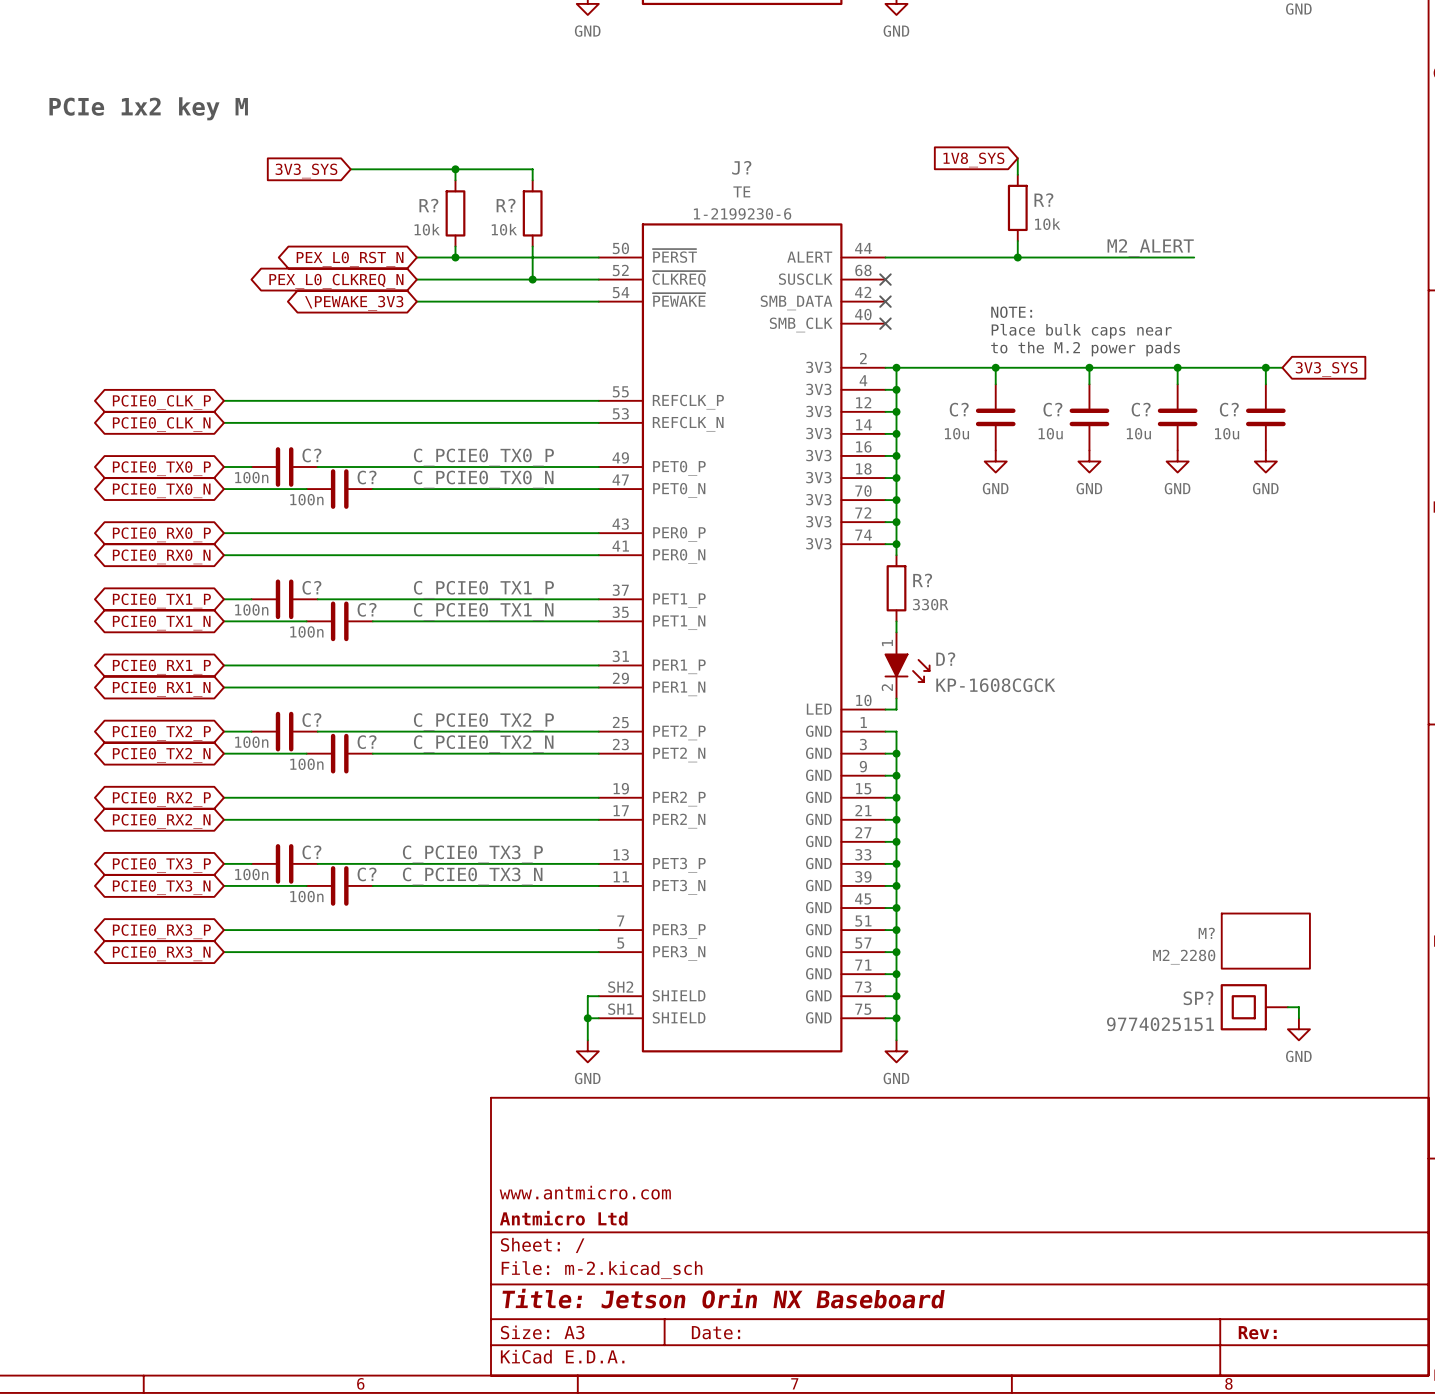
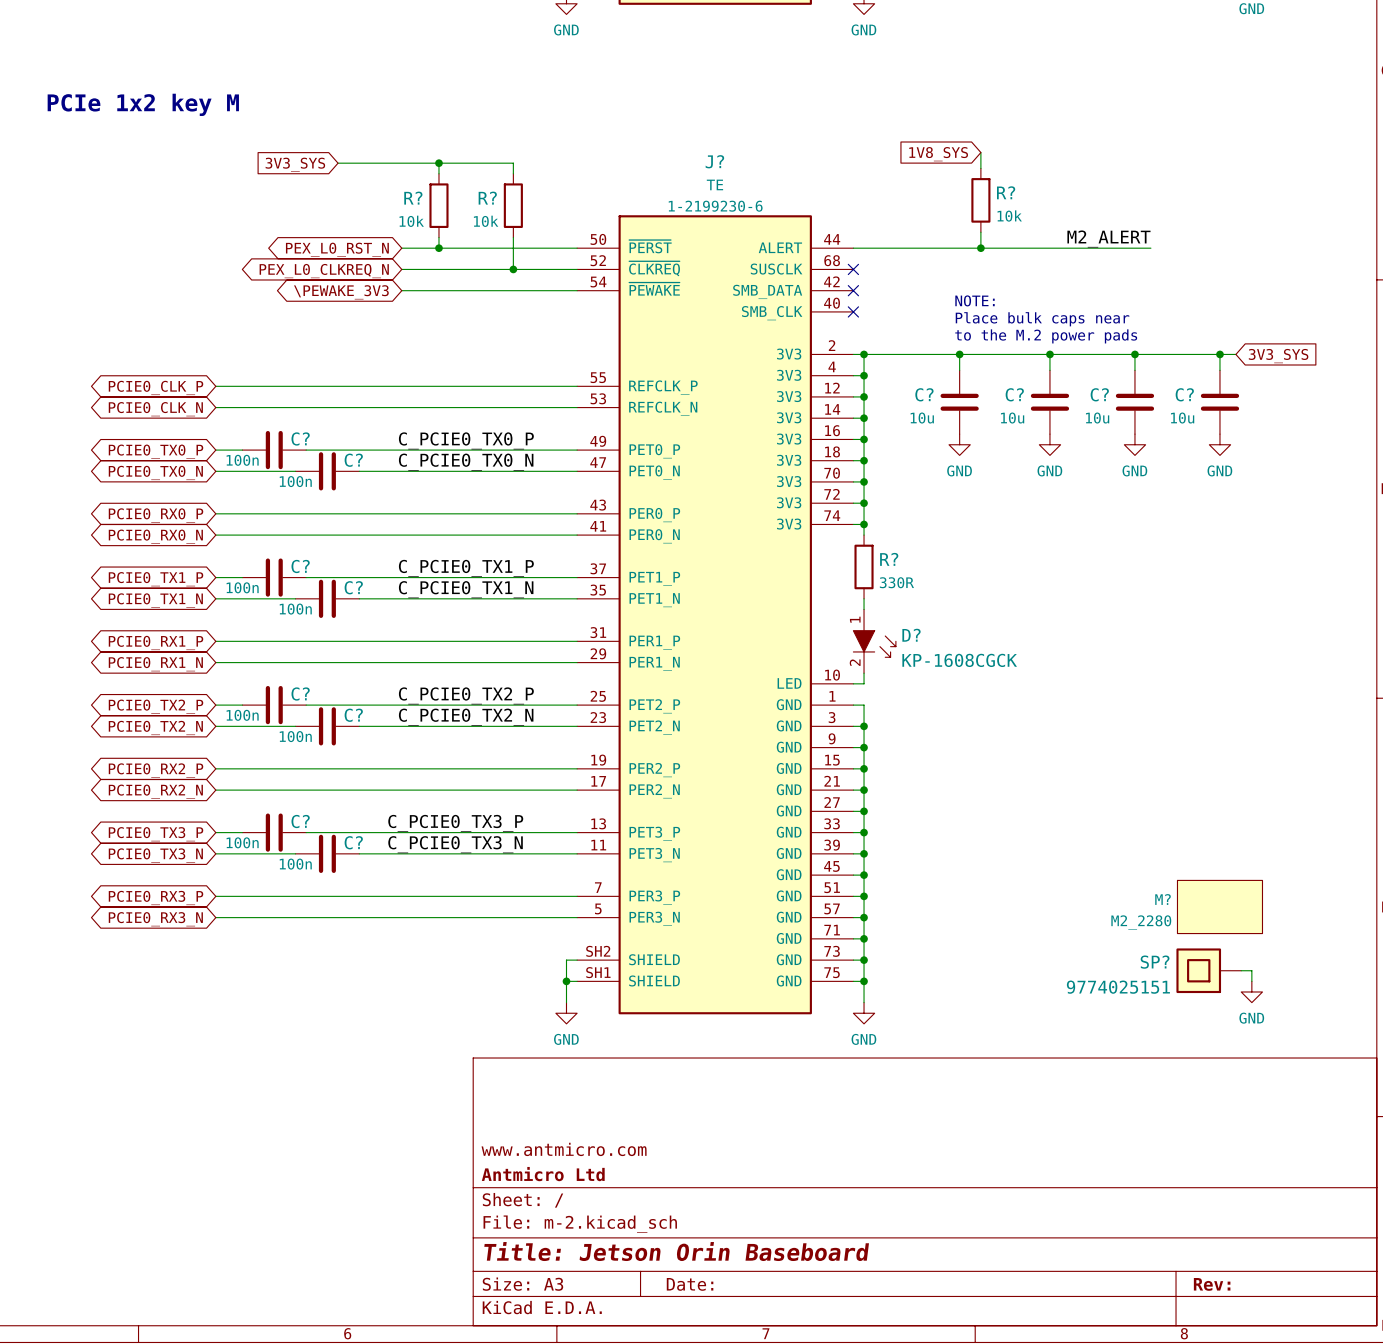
title block: Title: Jetson Orin NX Baseboard (723, 1298) -> Title: Jetson Orin Baseboard (676, 1251)

